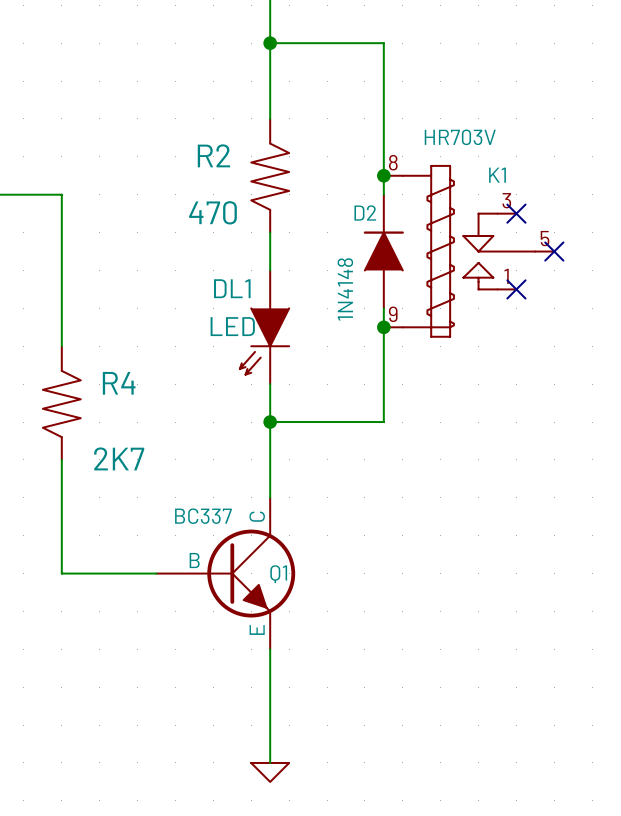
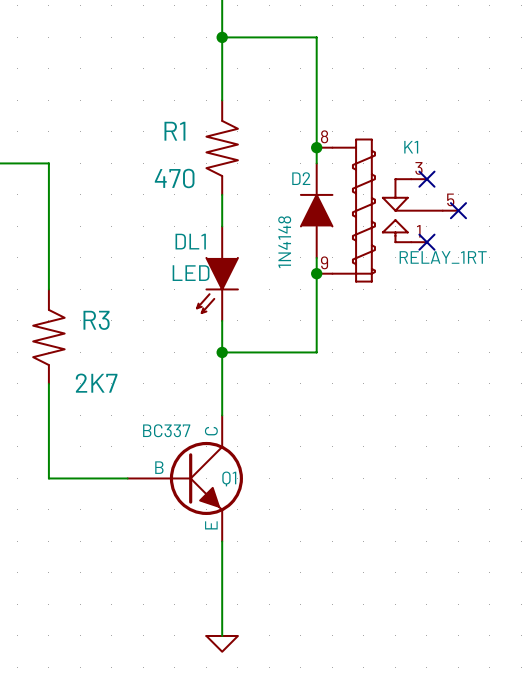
K1 value: HR703V (460, 137) -> RELAY_1RT (443, 257)
R2 name: R2 (213, 155) -> R1 (174, 131)
R4 name: R4 (119, 383) -> R3 (96, 320)

